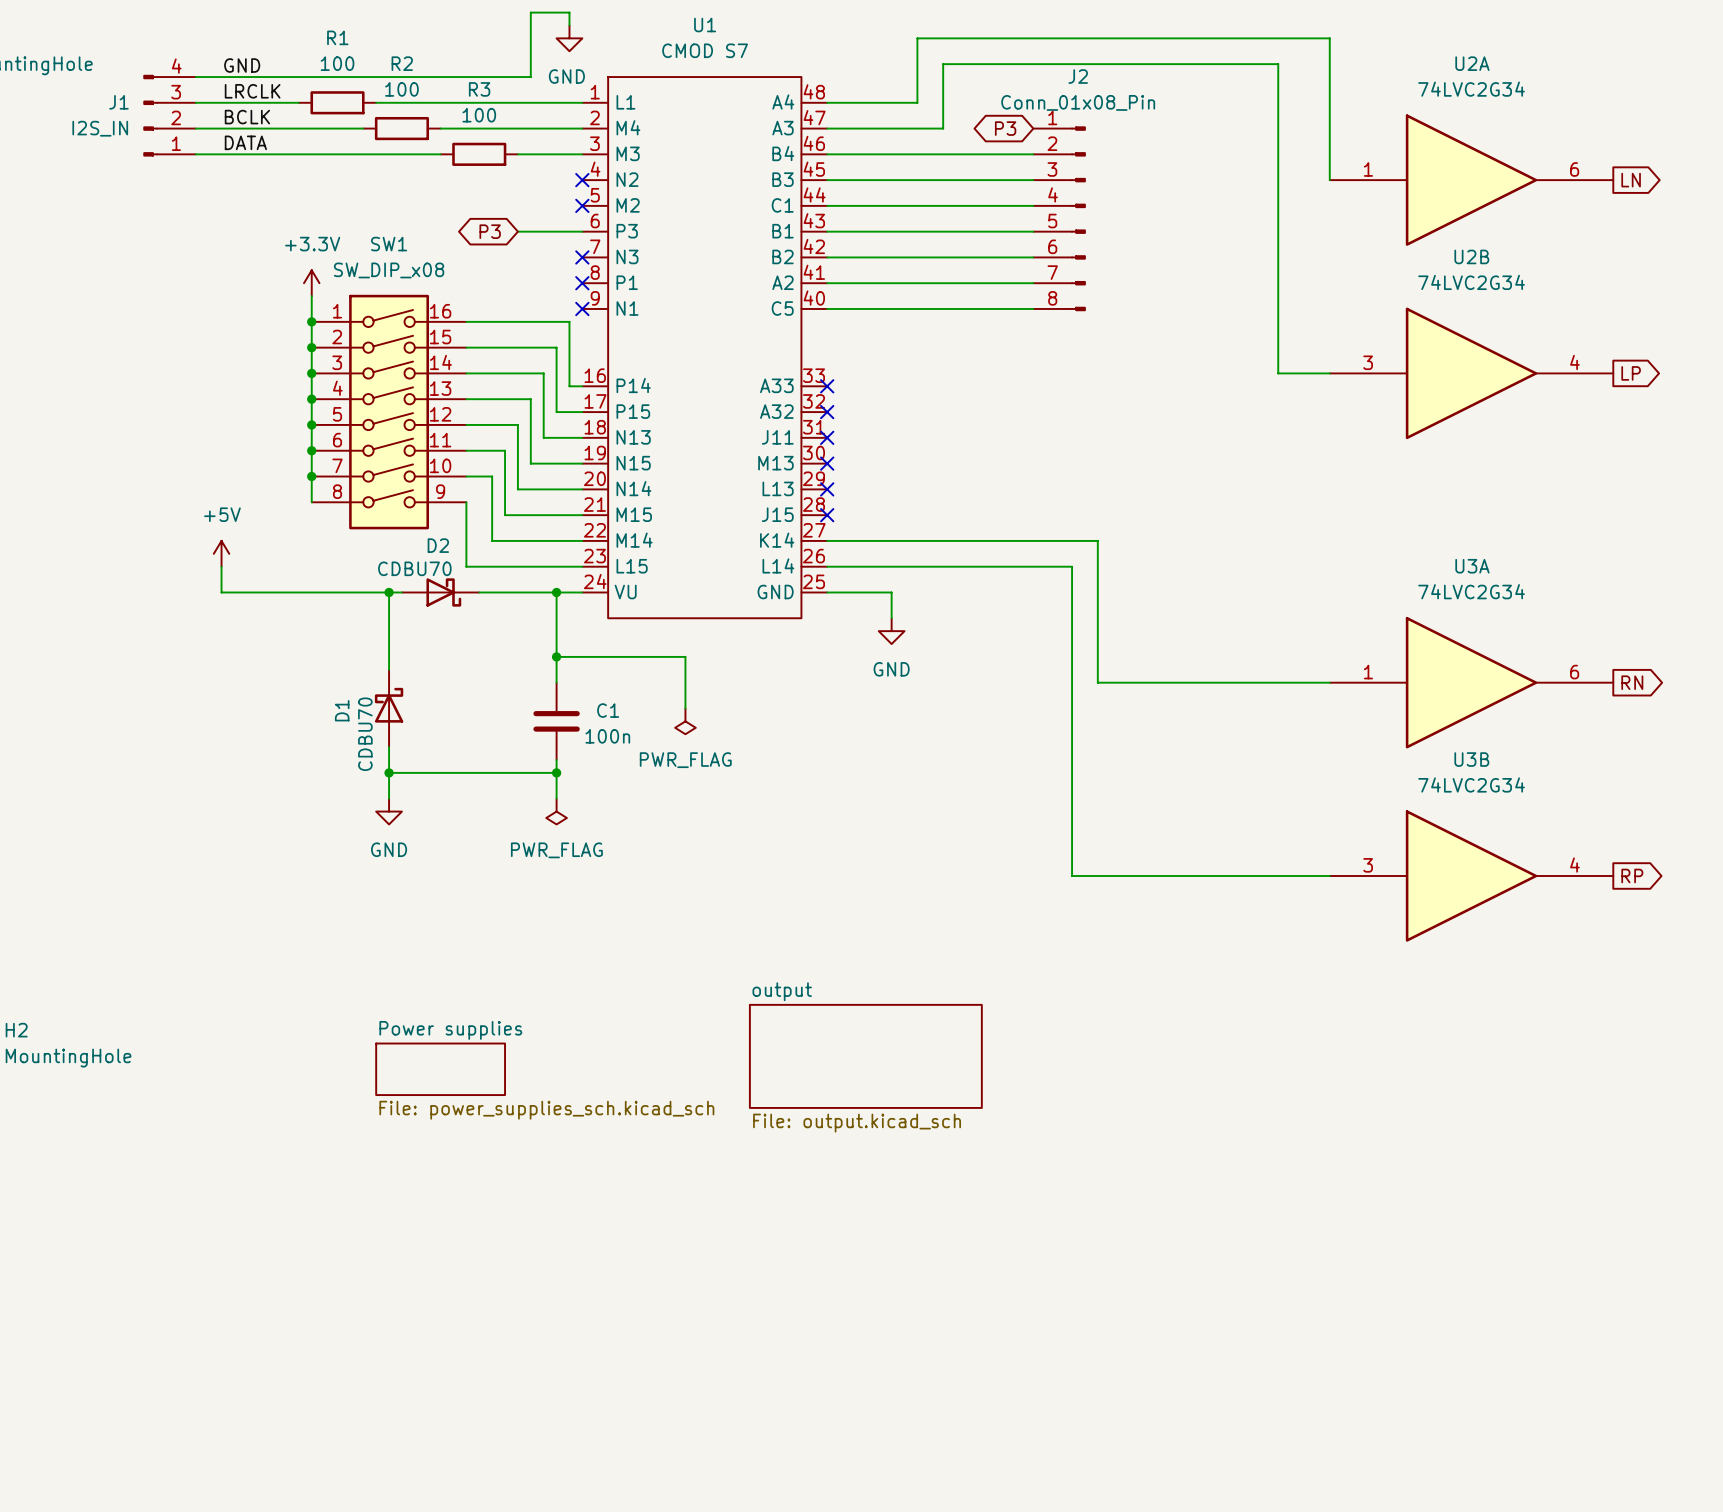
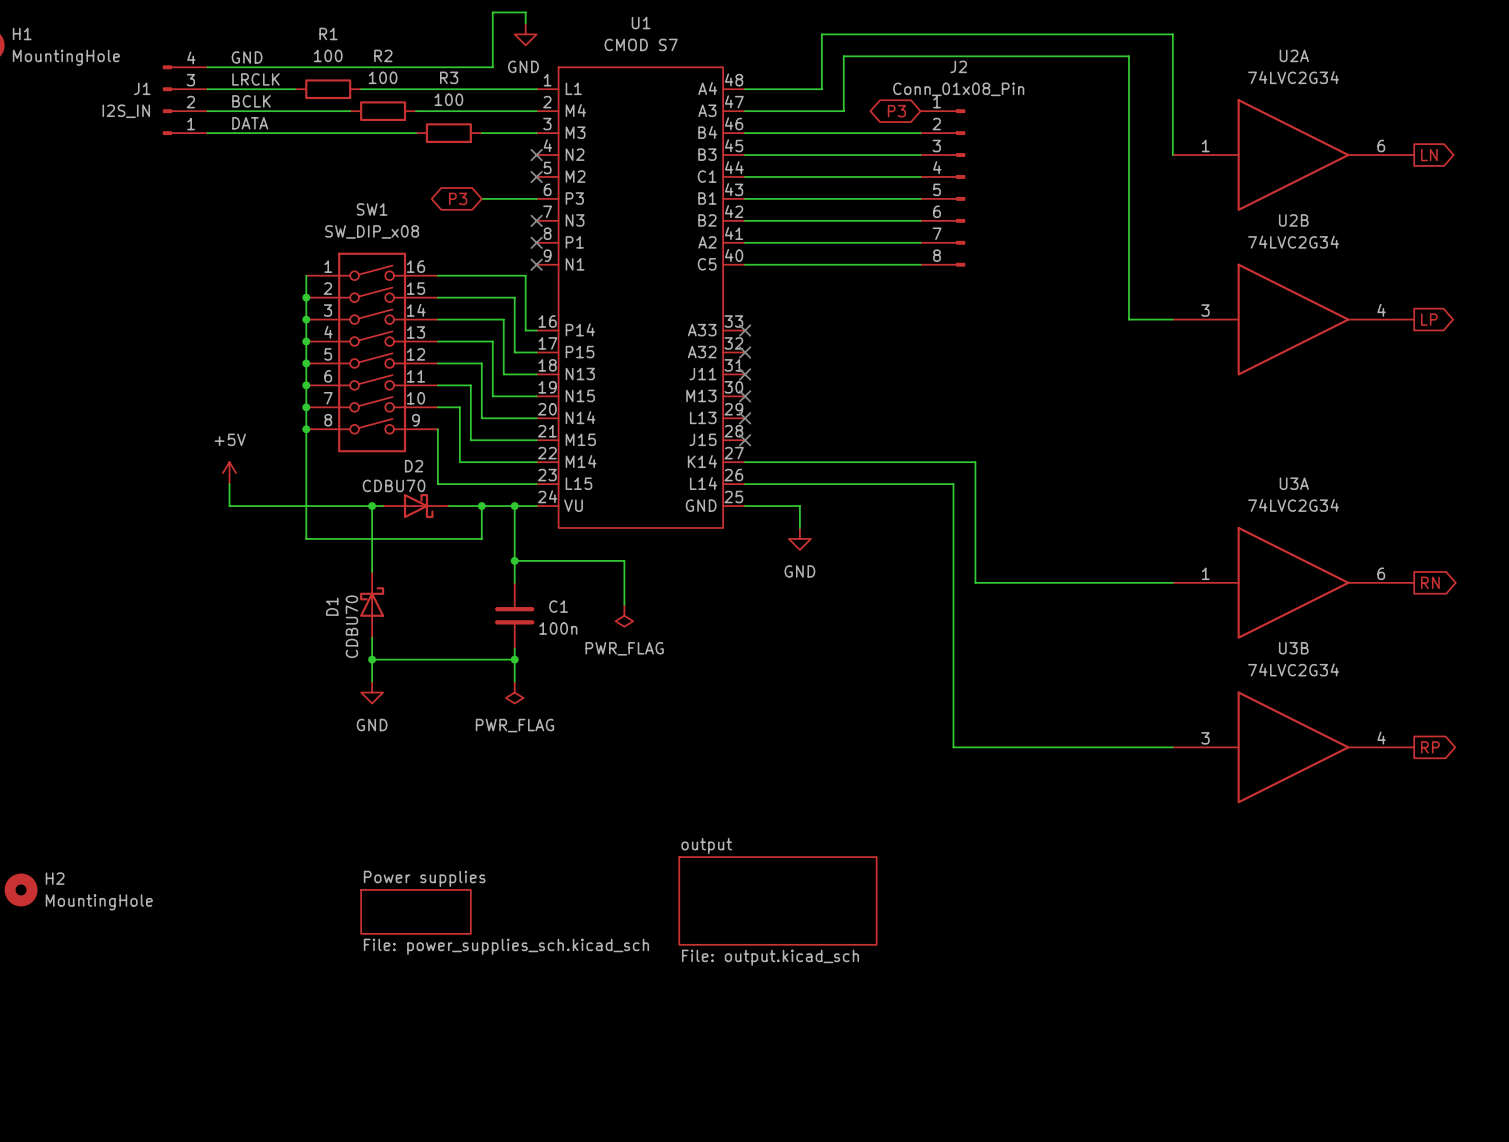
power symbol: +3.3V (311, 283) -> none
wire: (311, 296) (311, 321) -> none
junction: (311, 321) -> none
wire: none -> (306, 429) (306, 538) (481, 538) (481, 506)
junction: none -> (306, 429)
junction: none -> (481, 506)

